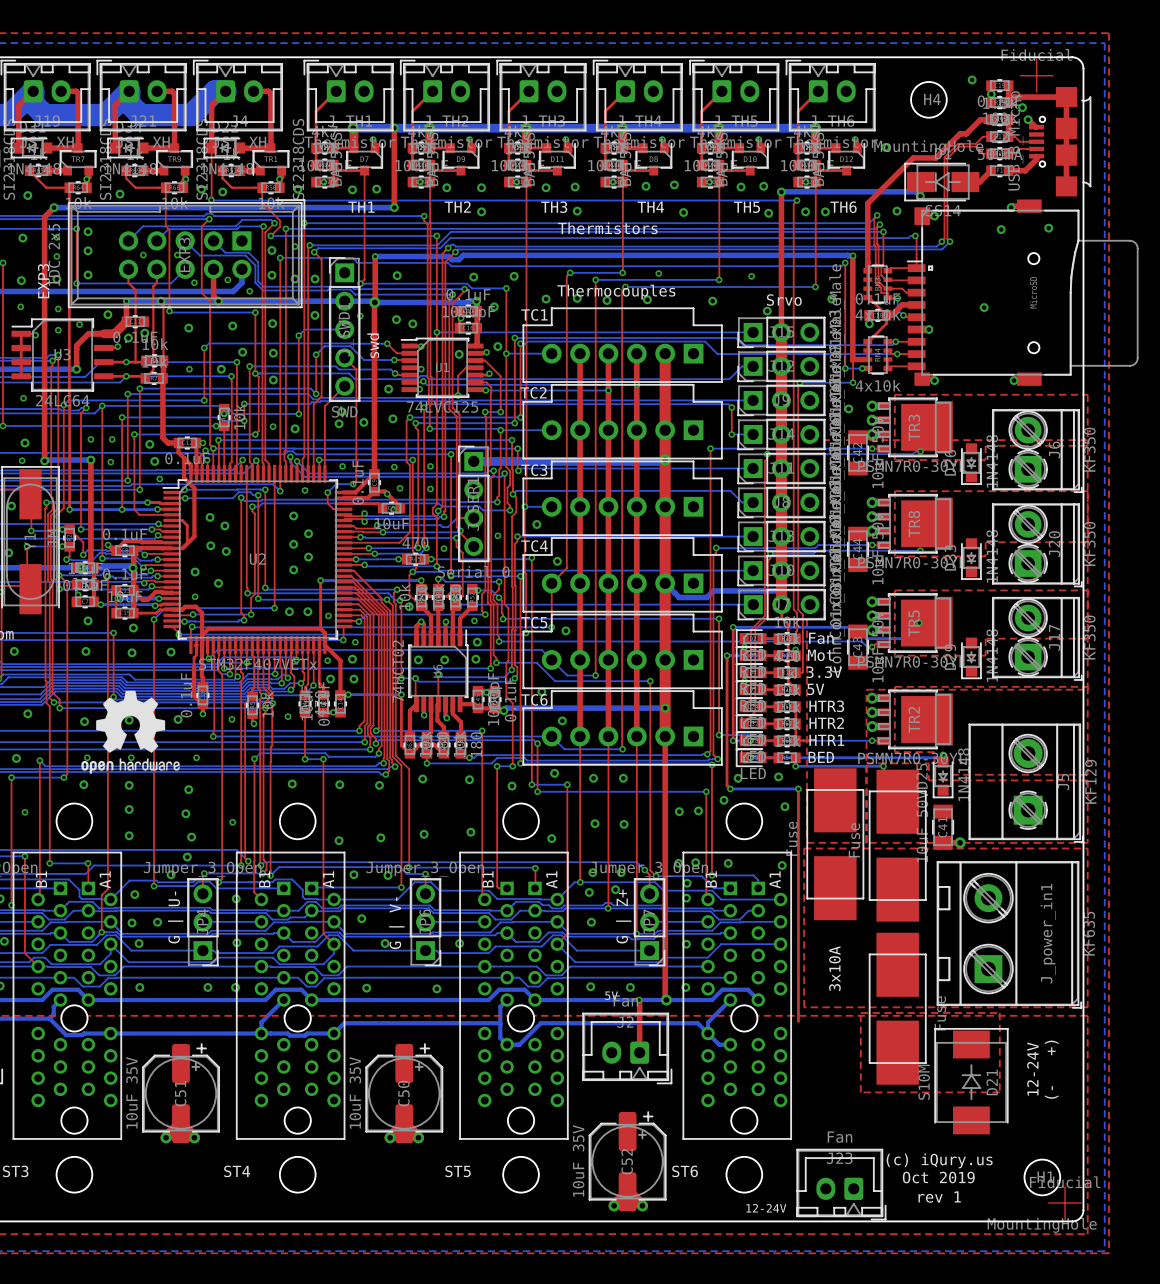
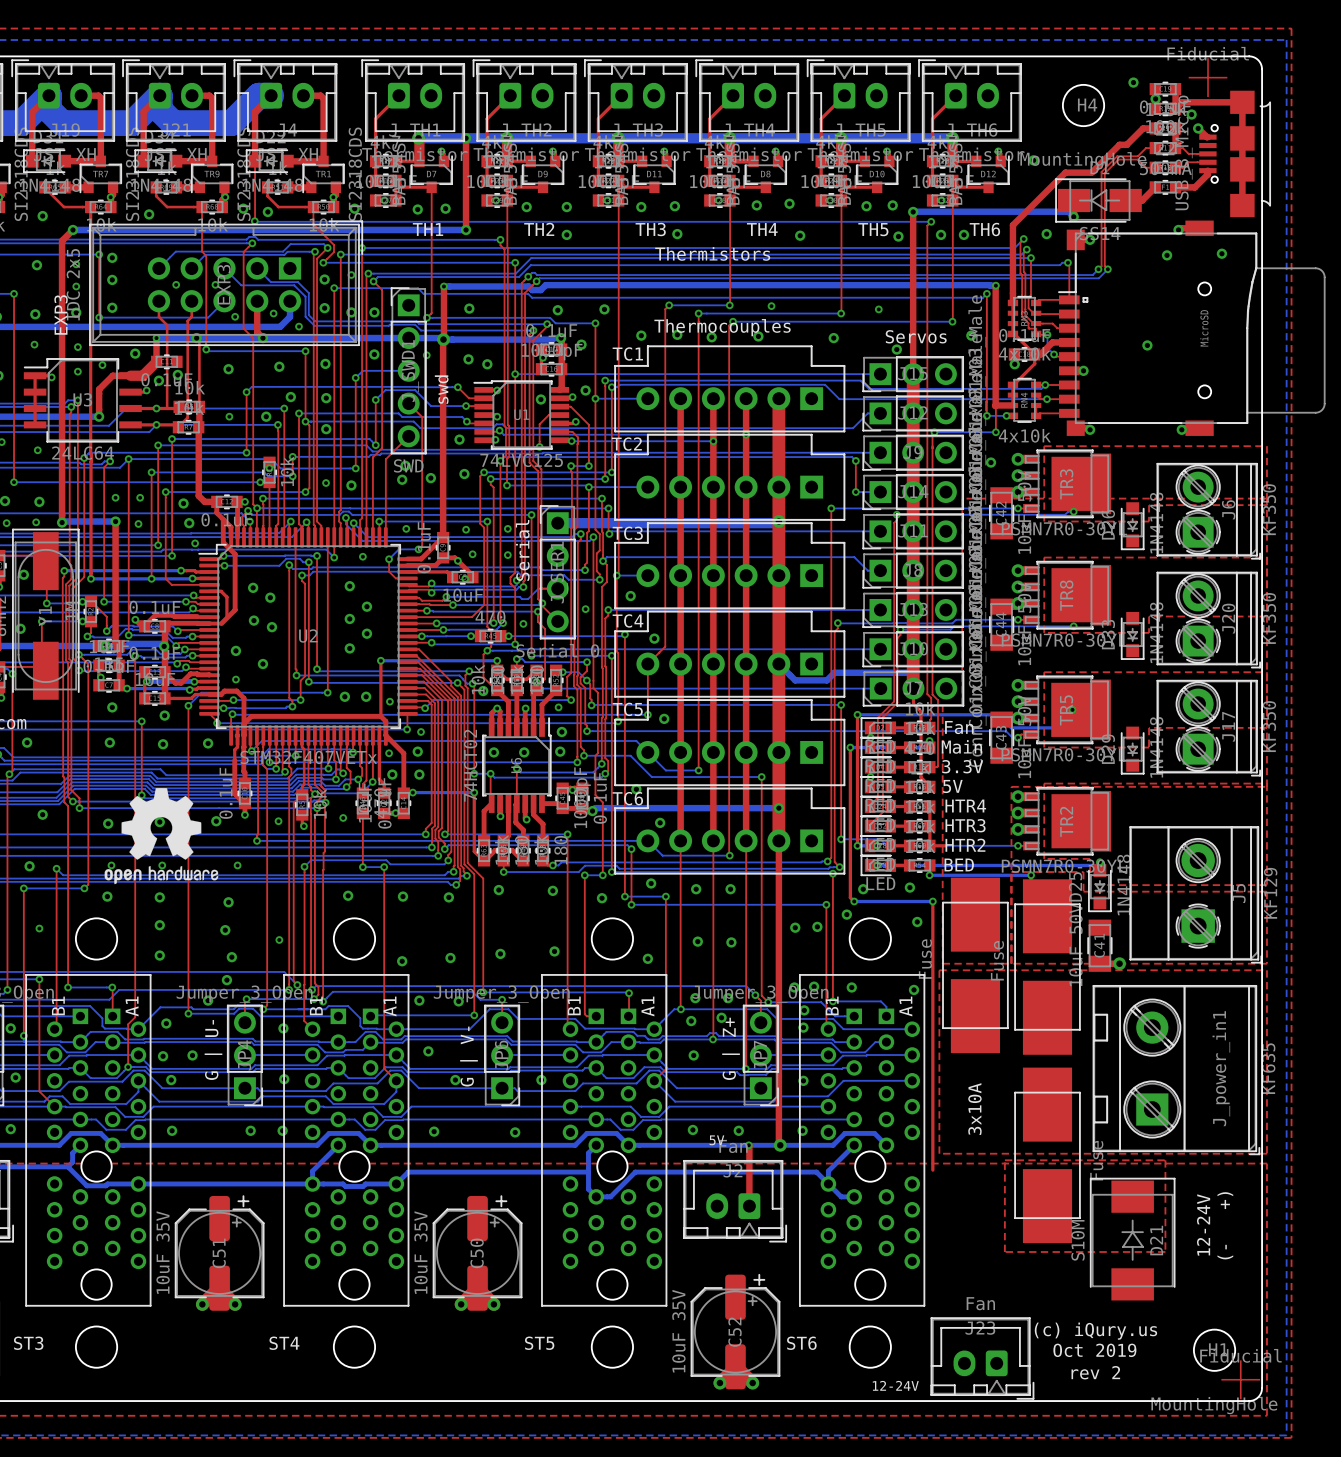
text: Srvo (784, 300) -> Servos (916, 336)
text: none -> Serial (522, 550)
text: Mot (820, 655) -> Main (961, 746)
text: HTR3 (826, 706) -> HTR4 (965, 806)
text: HTR2 (826, 723) -> HTR3 (965, 825)
text: HTR1 (826, 740) -> HTR2 (965, 845)
text: rev 1 (939, 1197) -> rev 2 (1095, 1372)

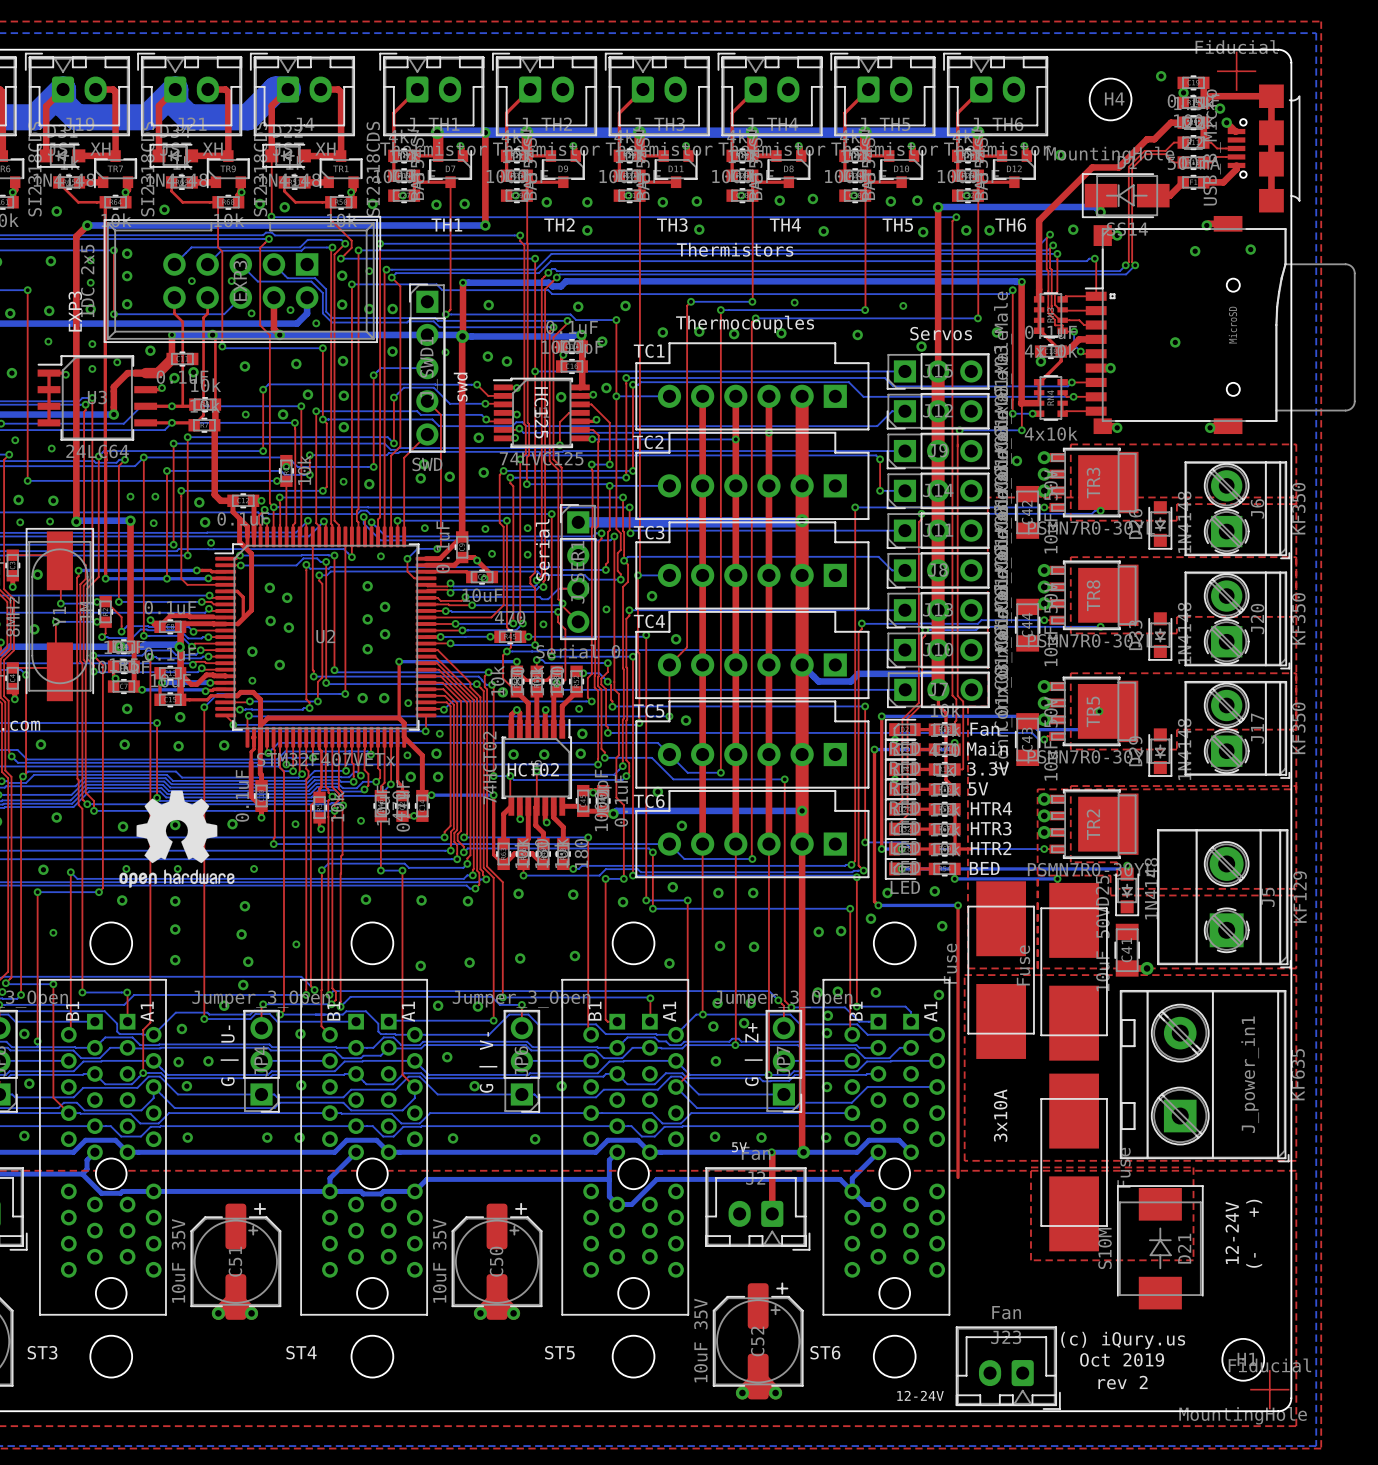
text: none -> HC125 (541, 412)
text: none -> HCT02 (533, 769)

